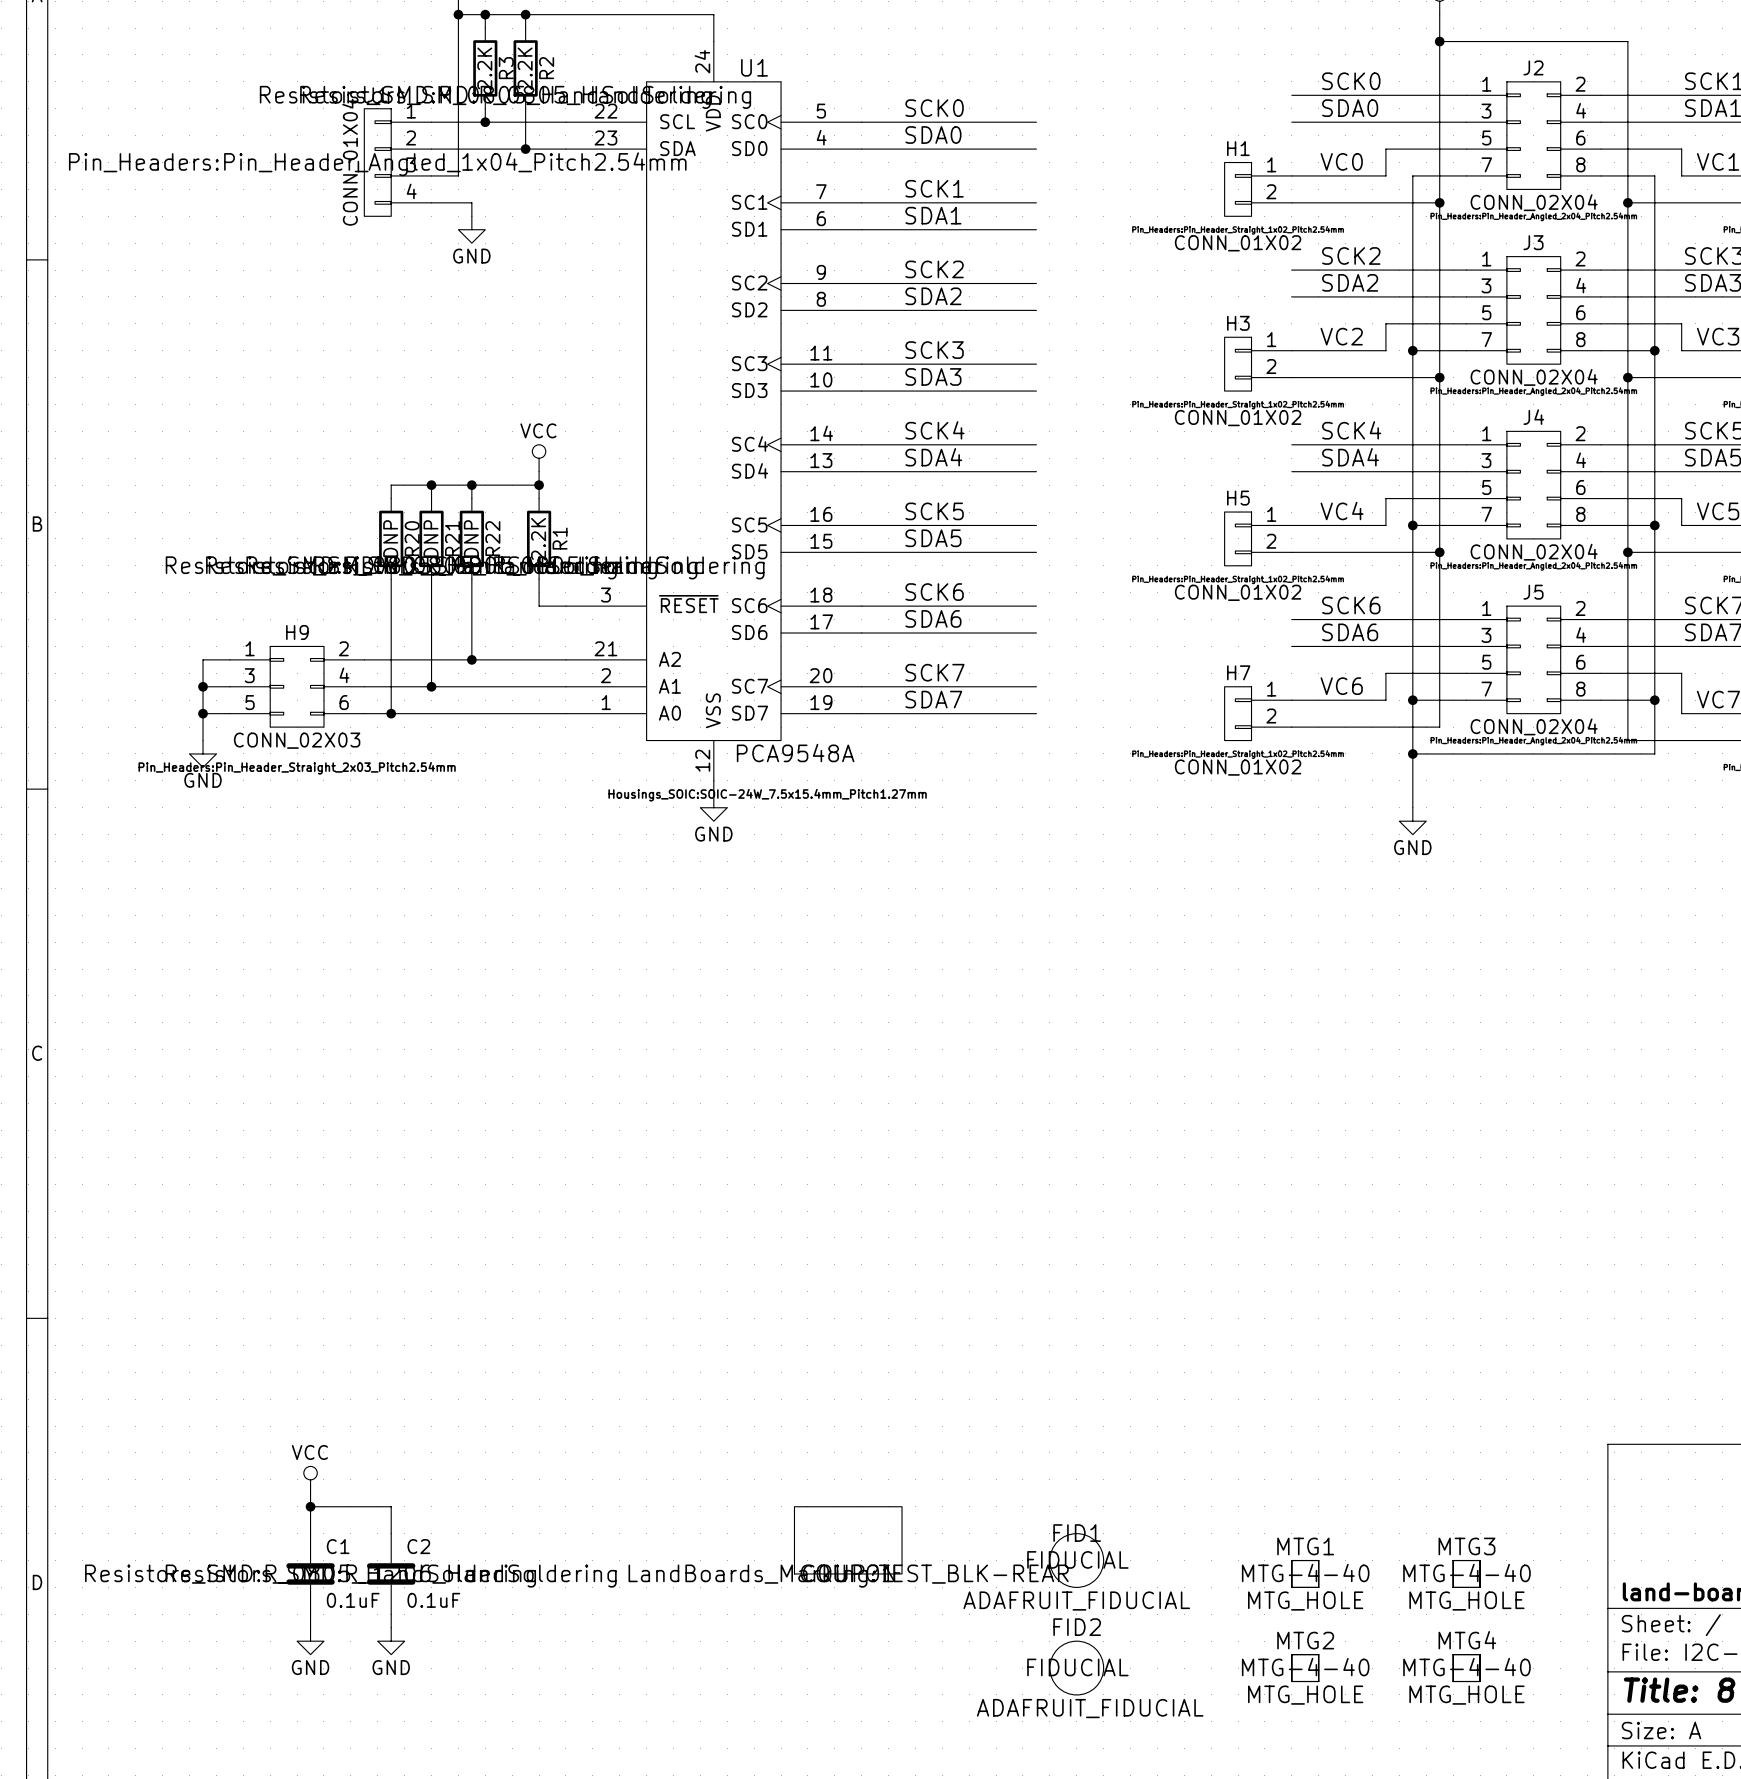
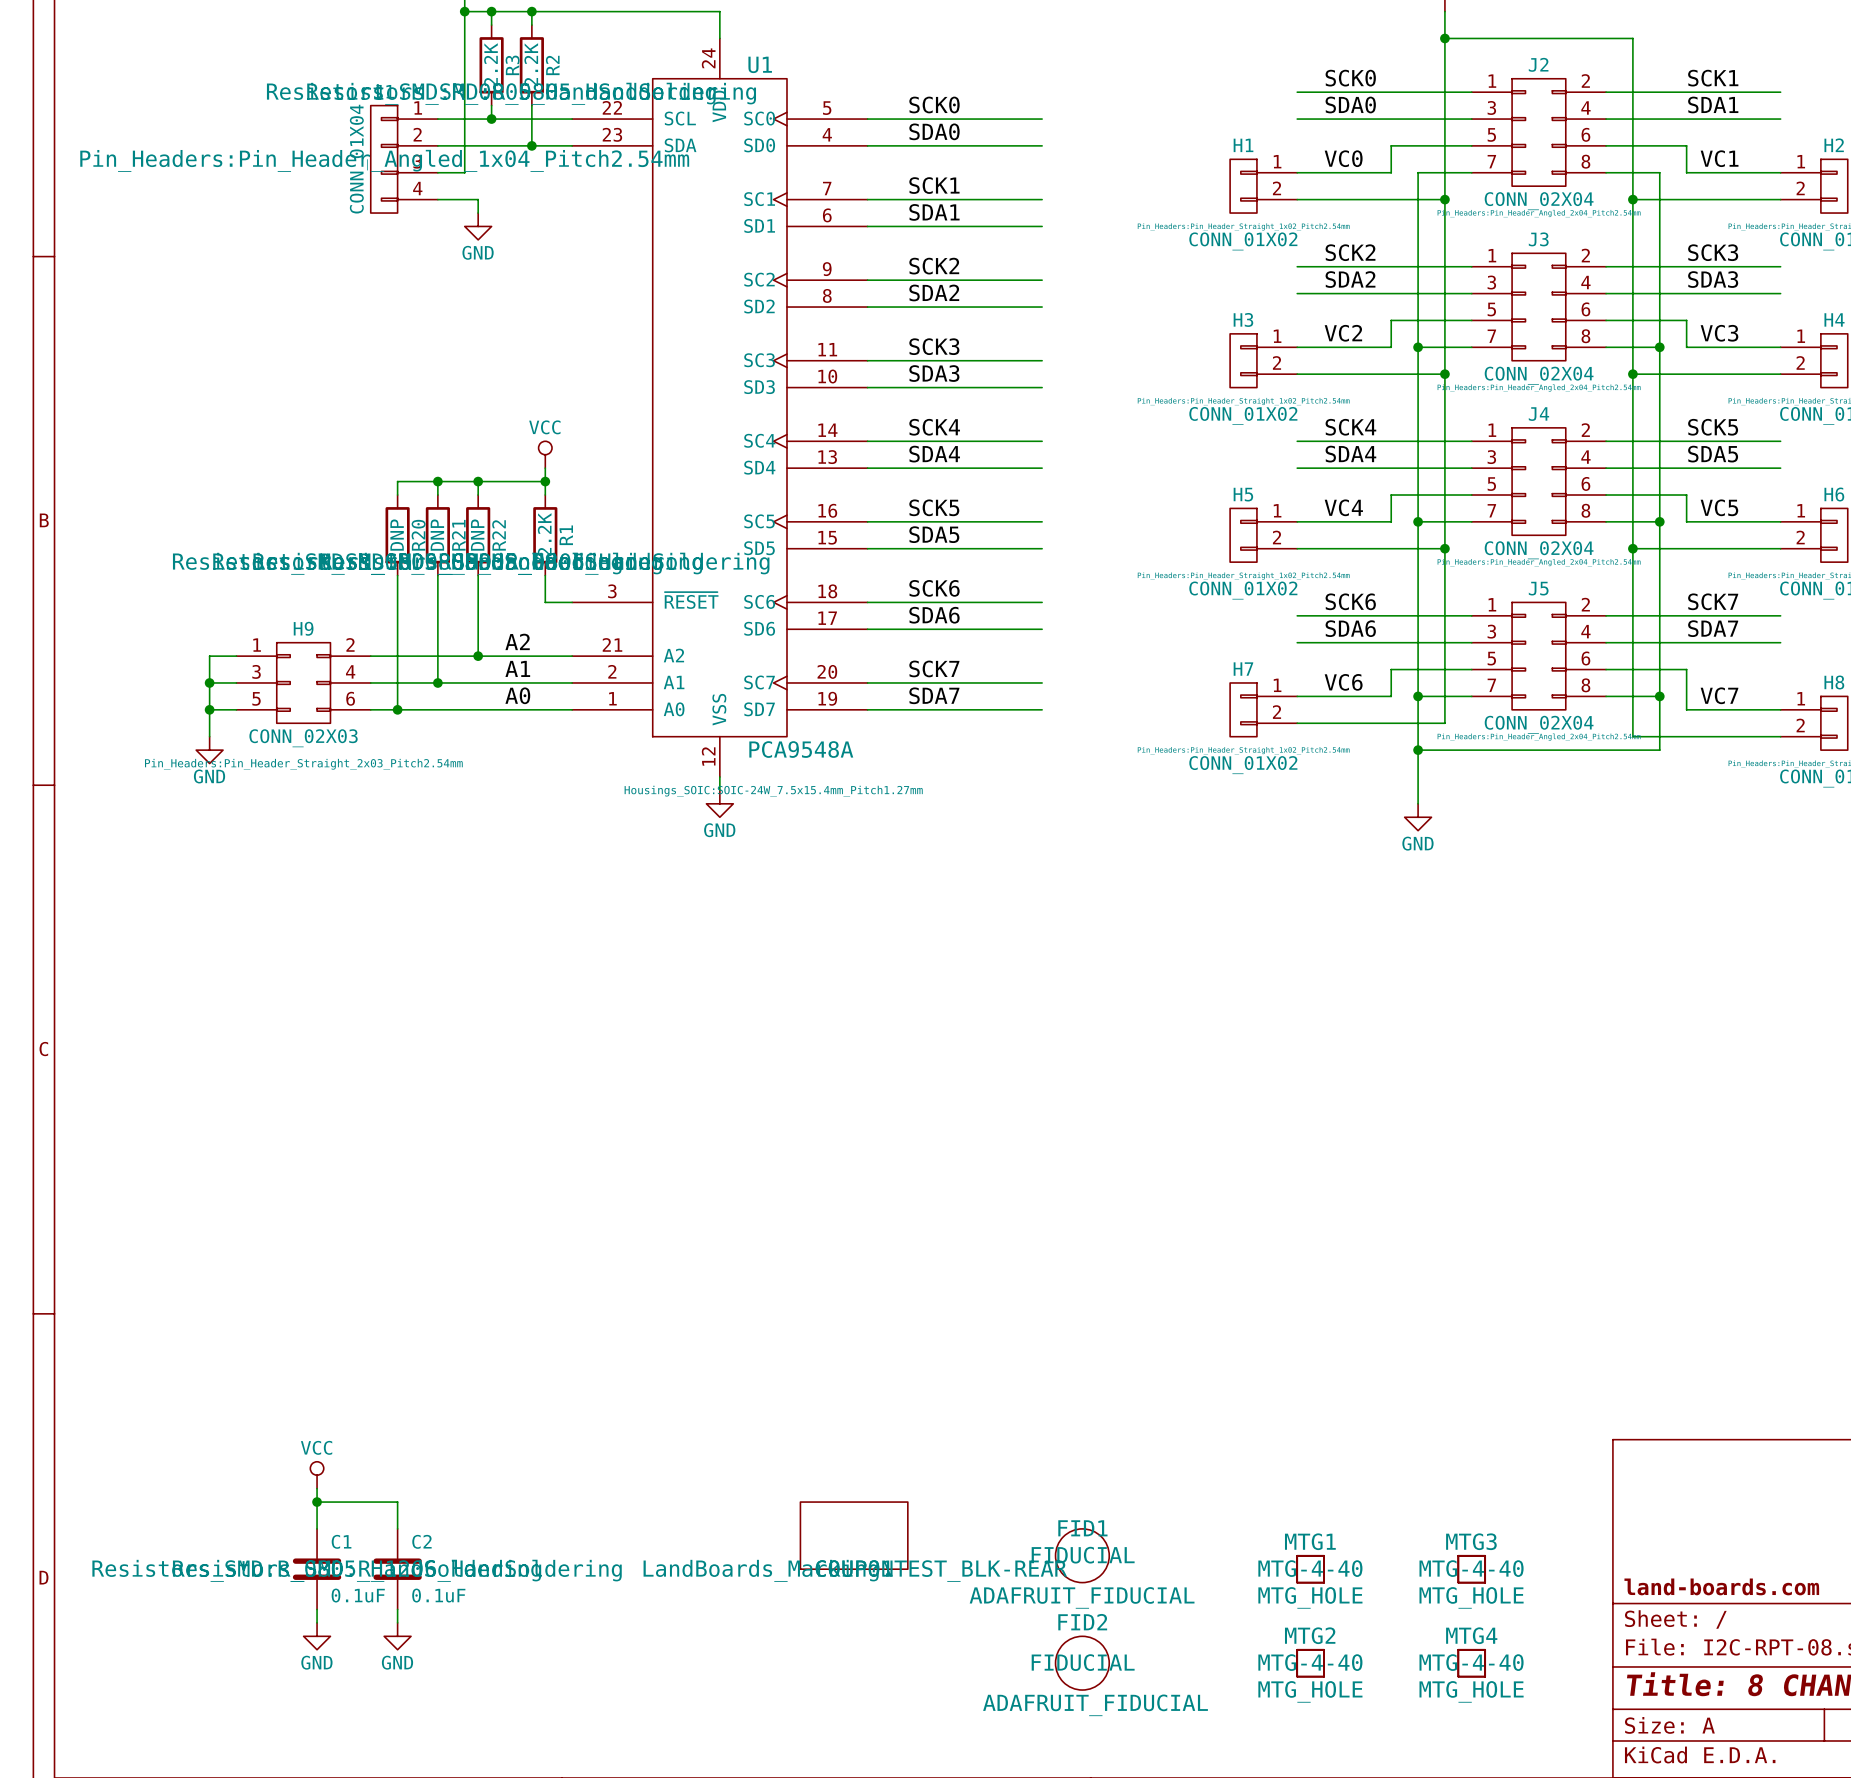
label: none -> A2 (517, 641)
label: none -> A1 (517, 668)
label: none -> A0 (517, 695)

